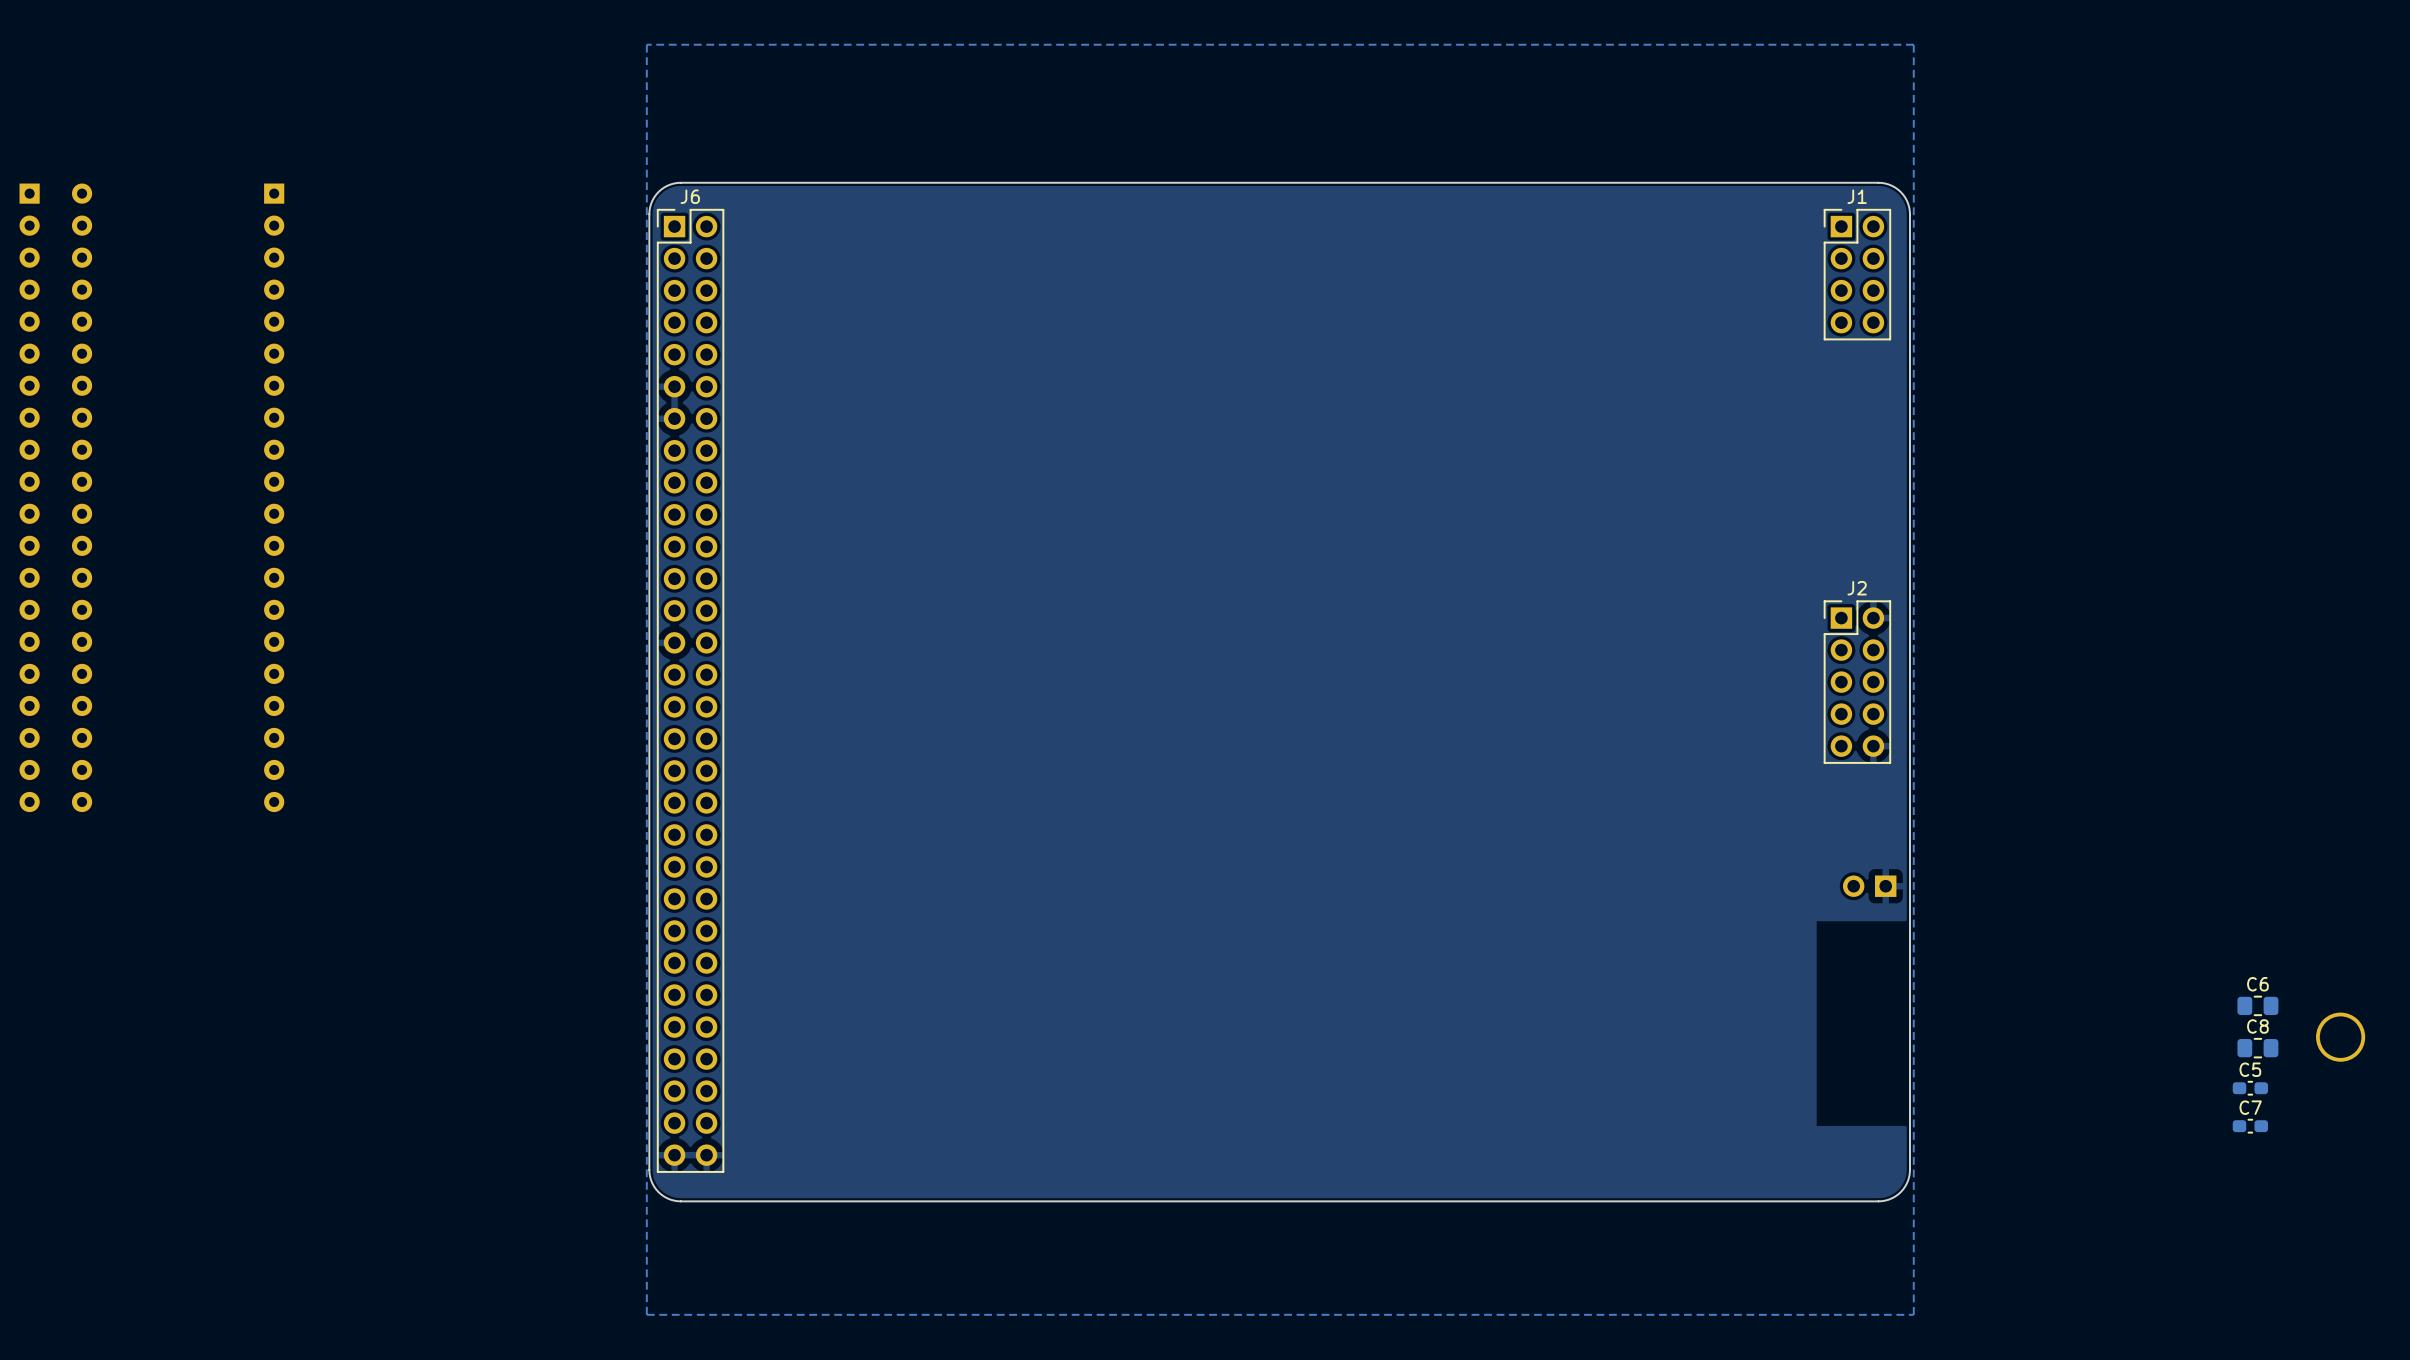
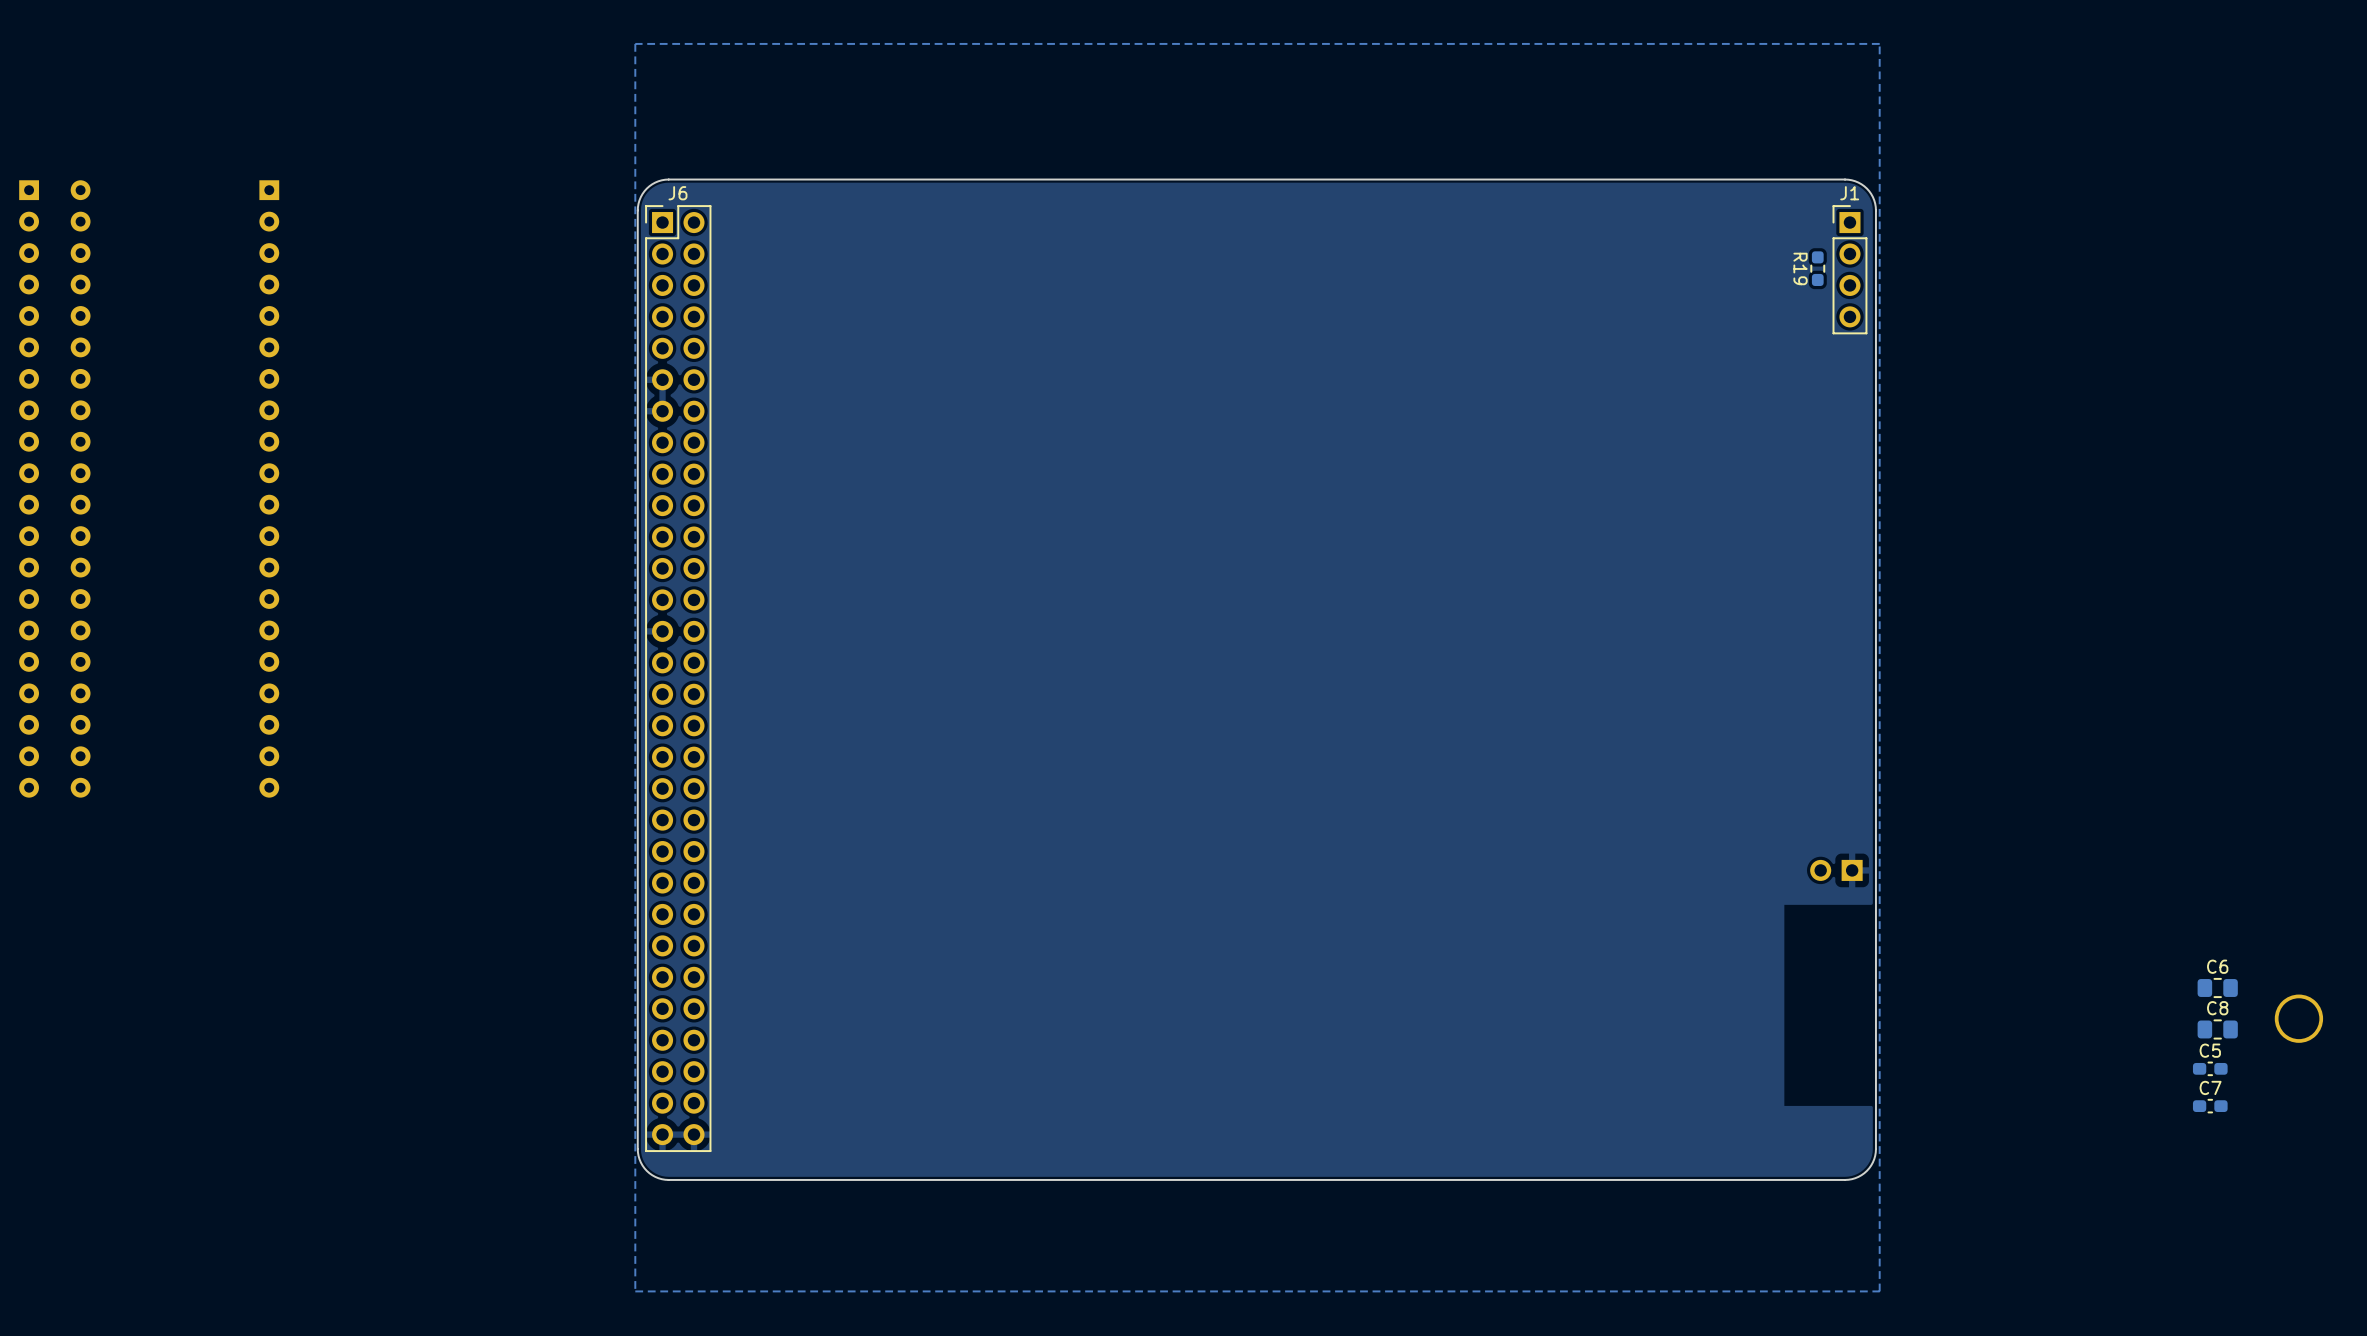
J1 footprint: [1823, 209, 1891, 341] -> [1832, 205, 1868, 335]
R19: none -> (1817, 268)
J2: (1857, 682) -> none

